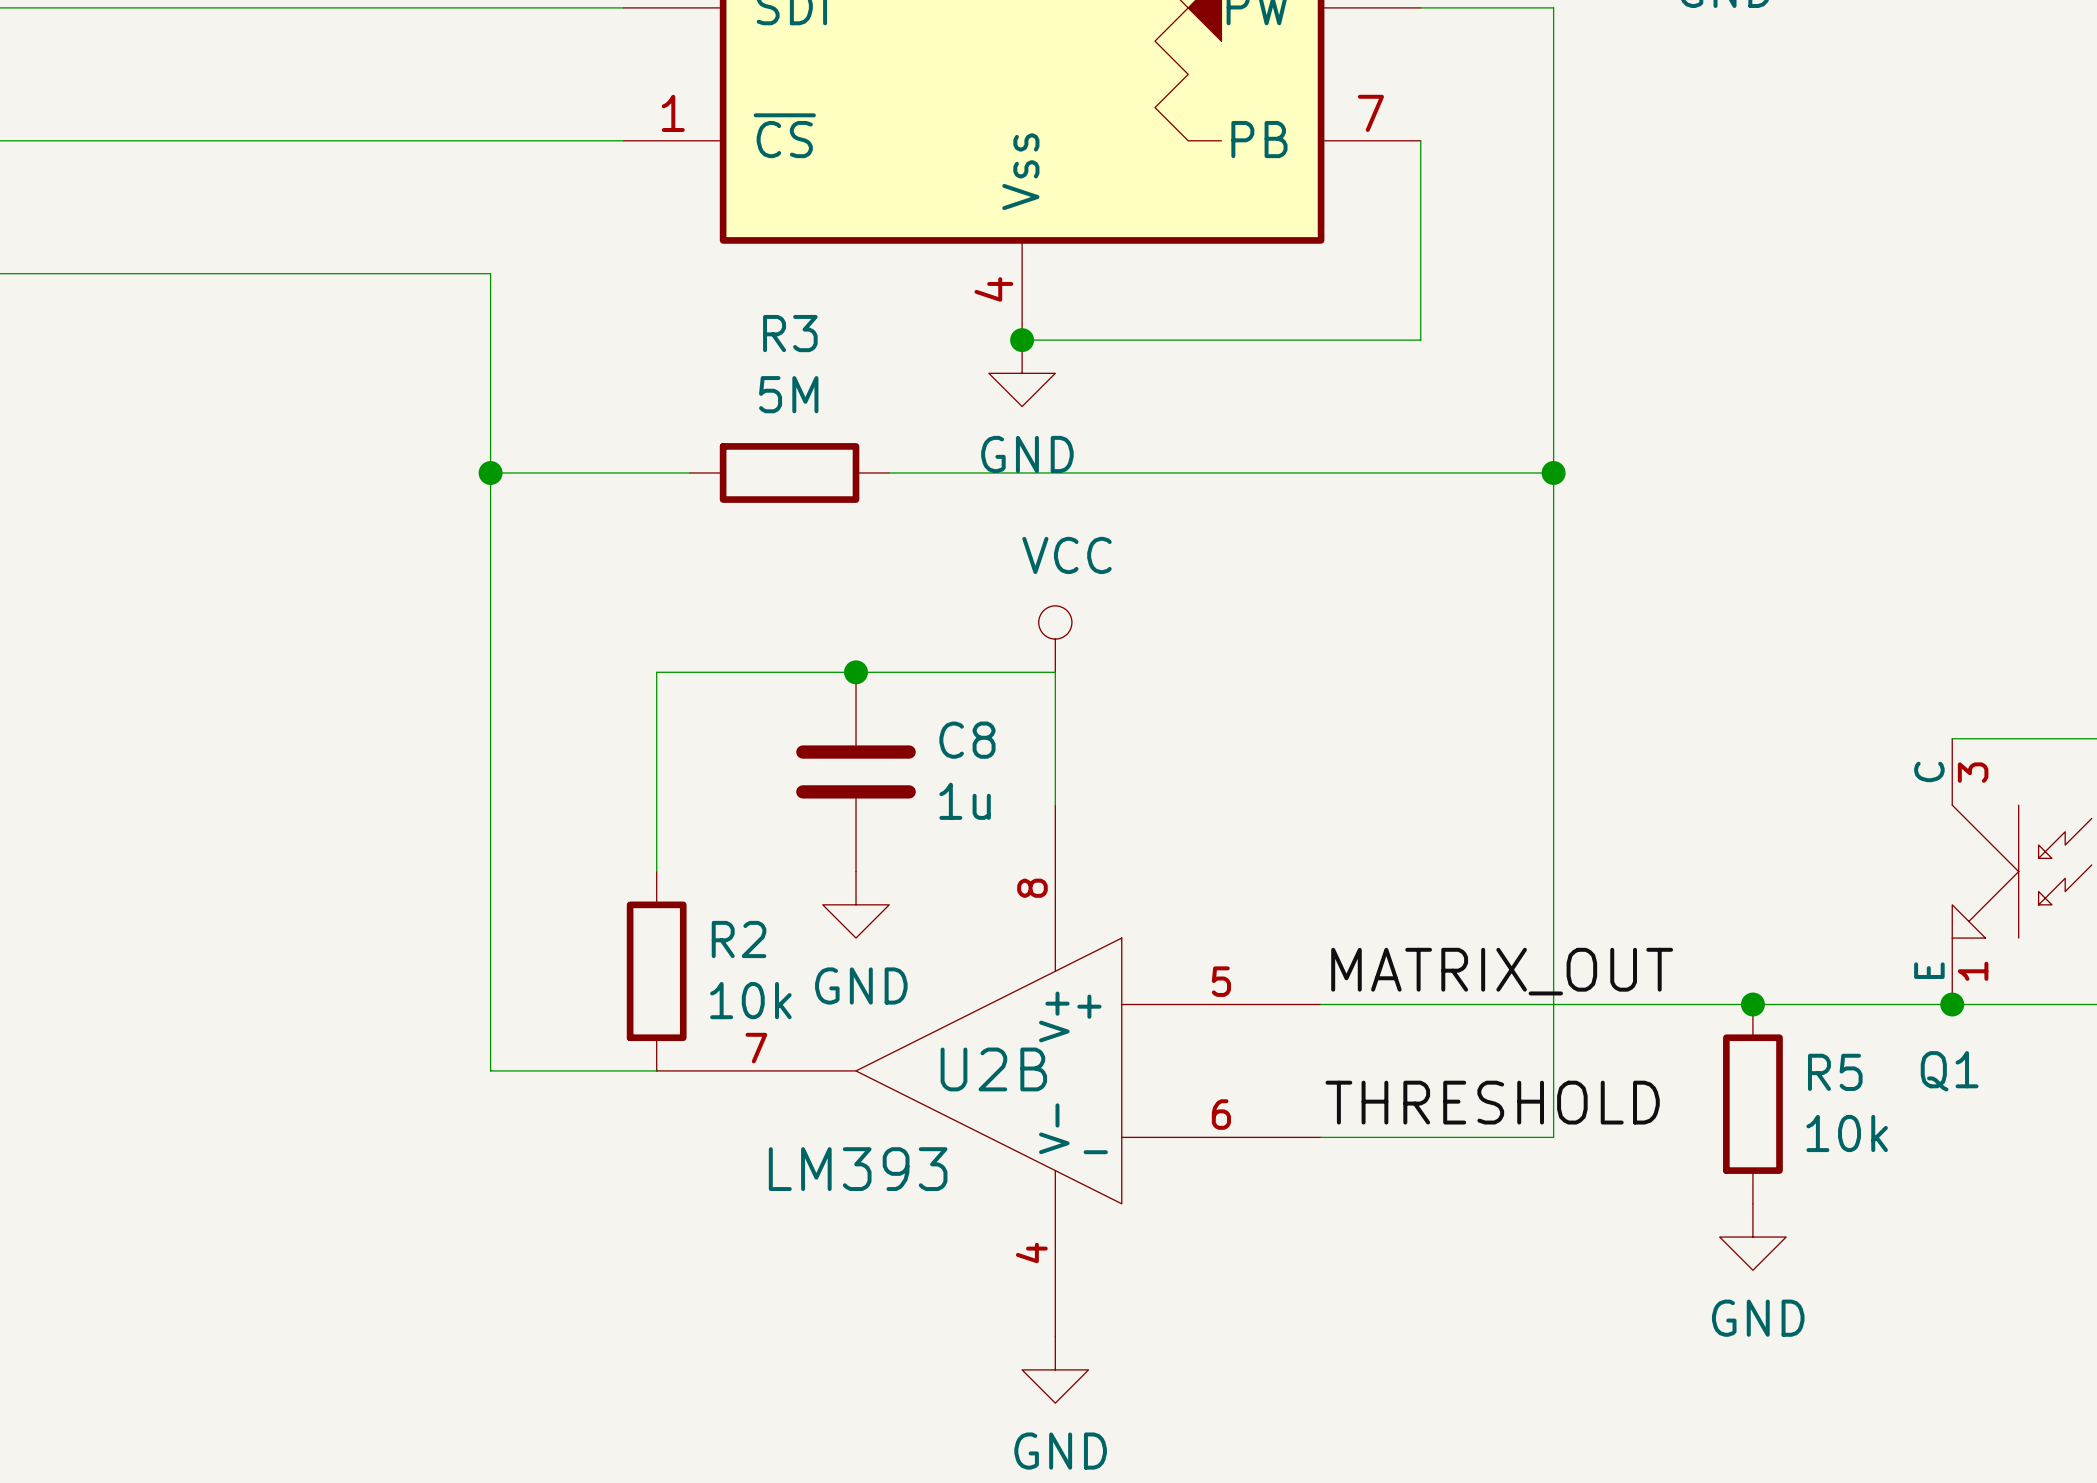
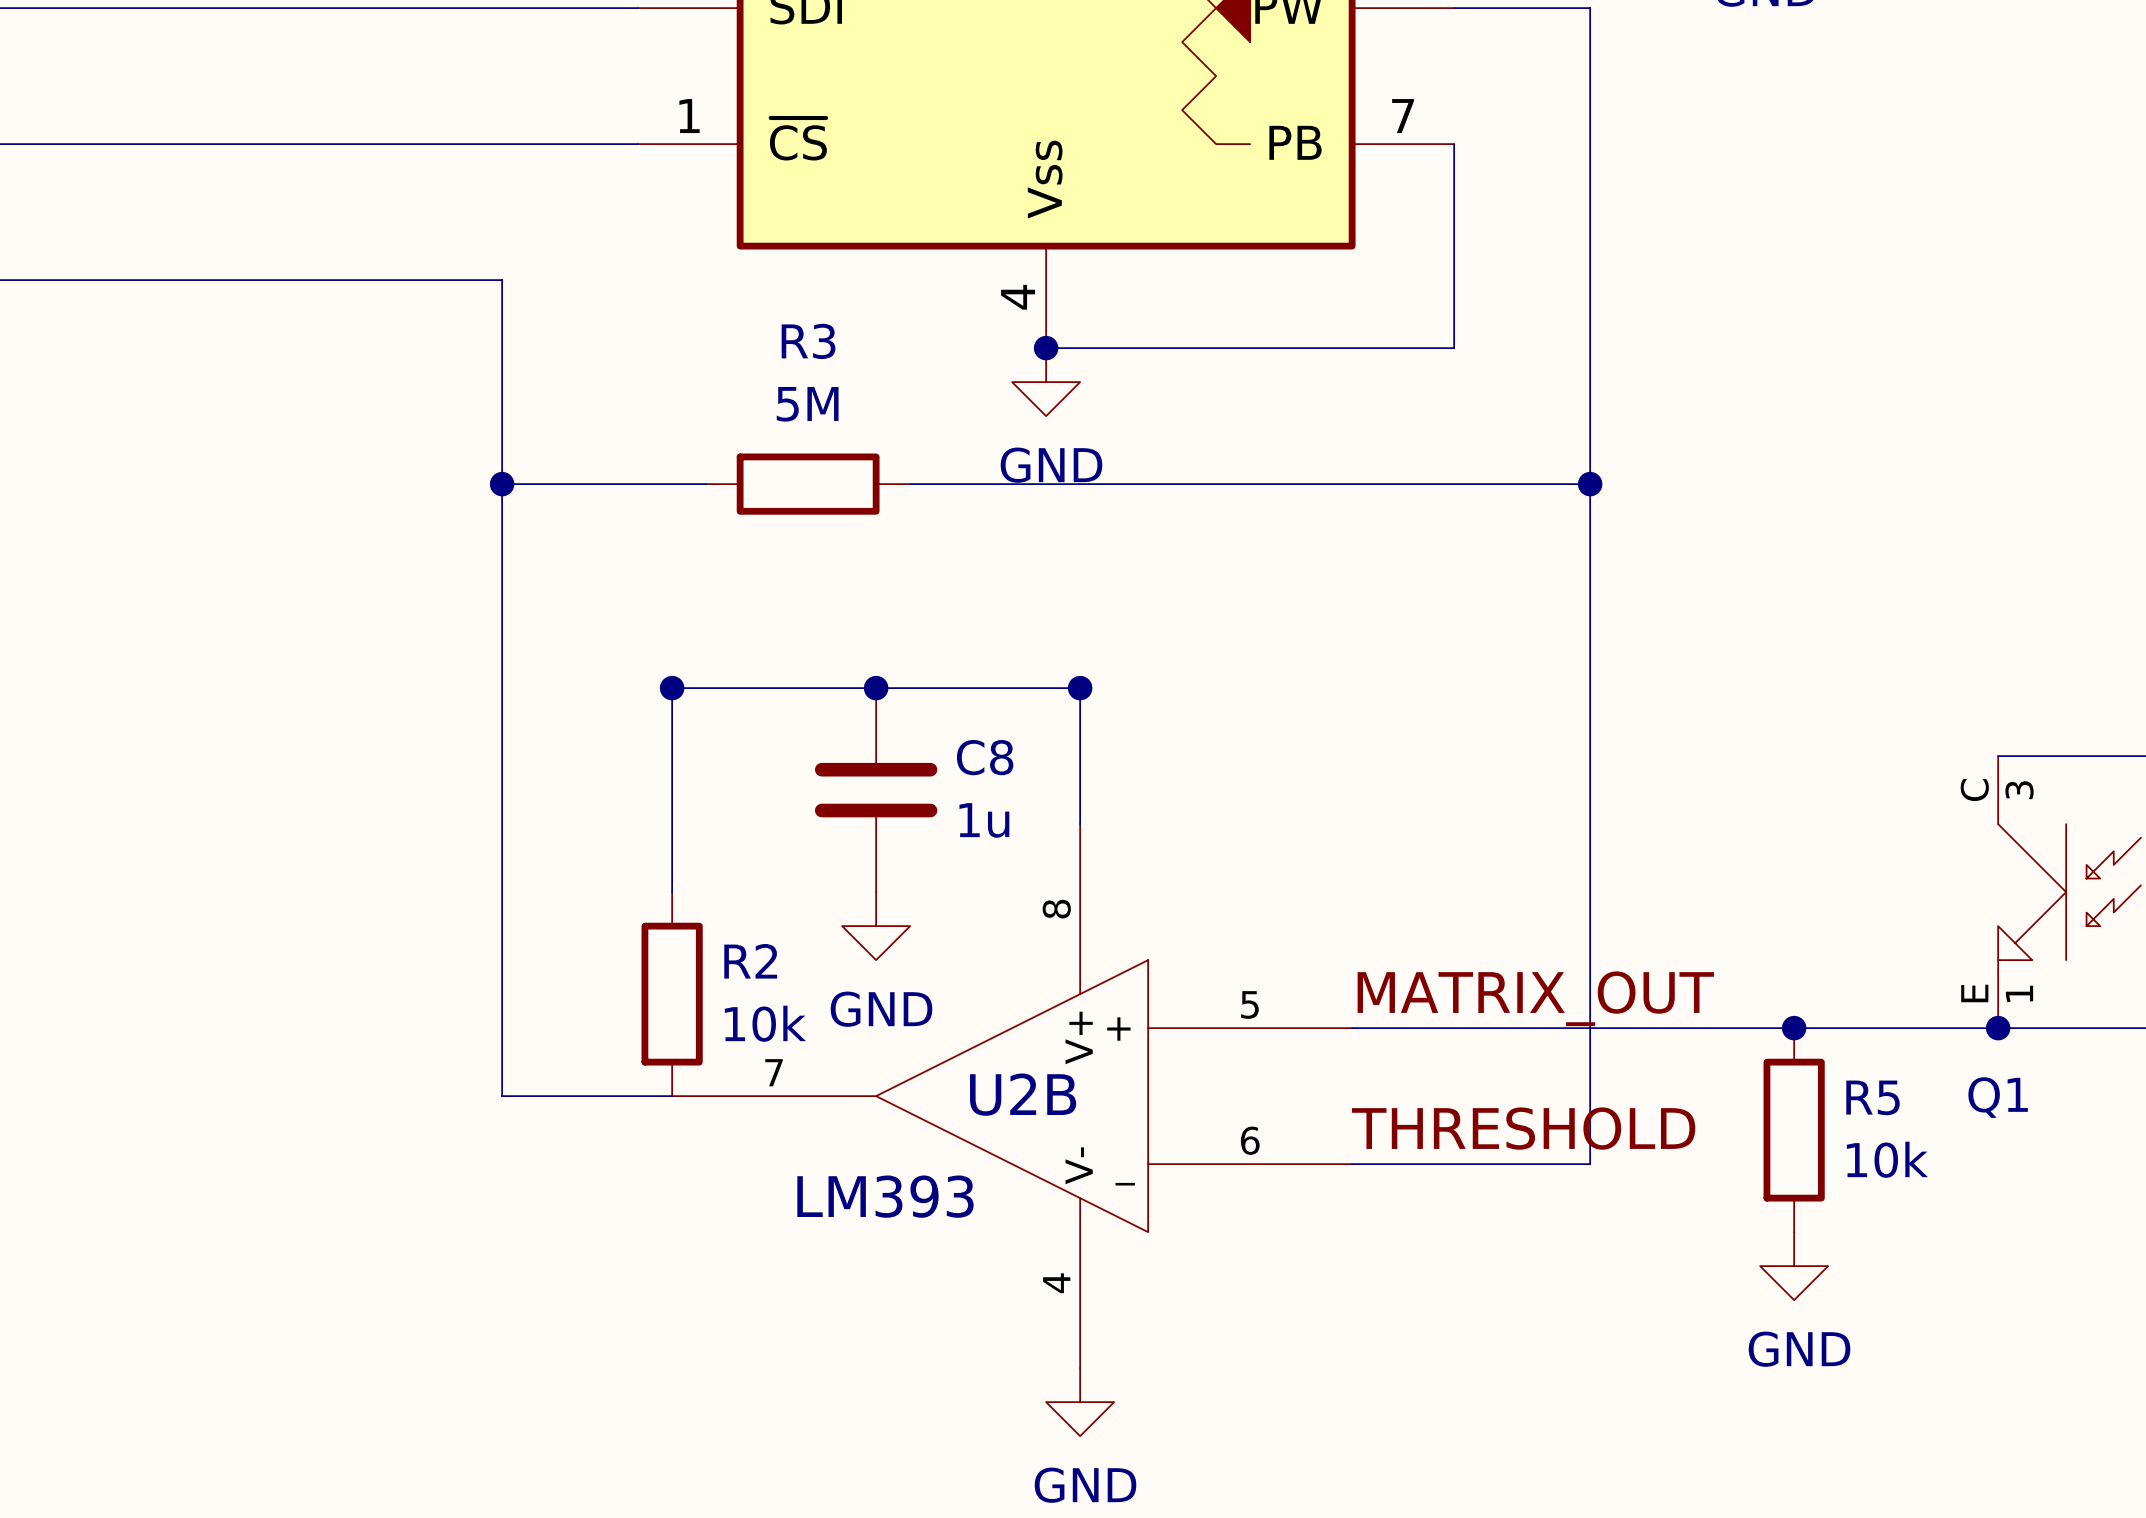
power symbol: VCC (1055, 639) -> none
junction: none -> (672, 688)
junction: none -> (1080, 688)

